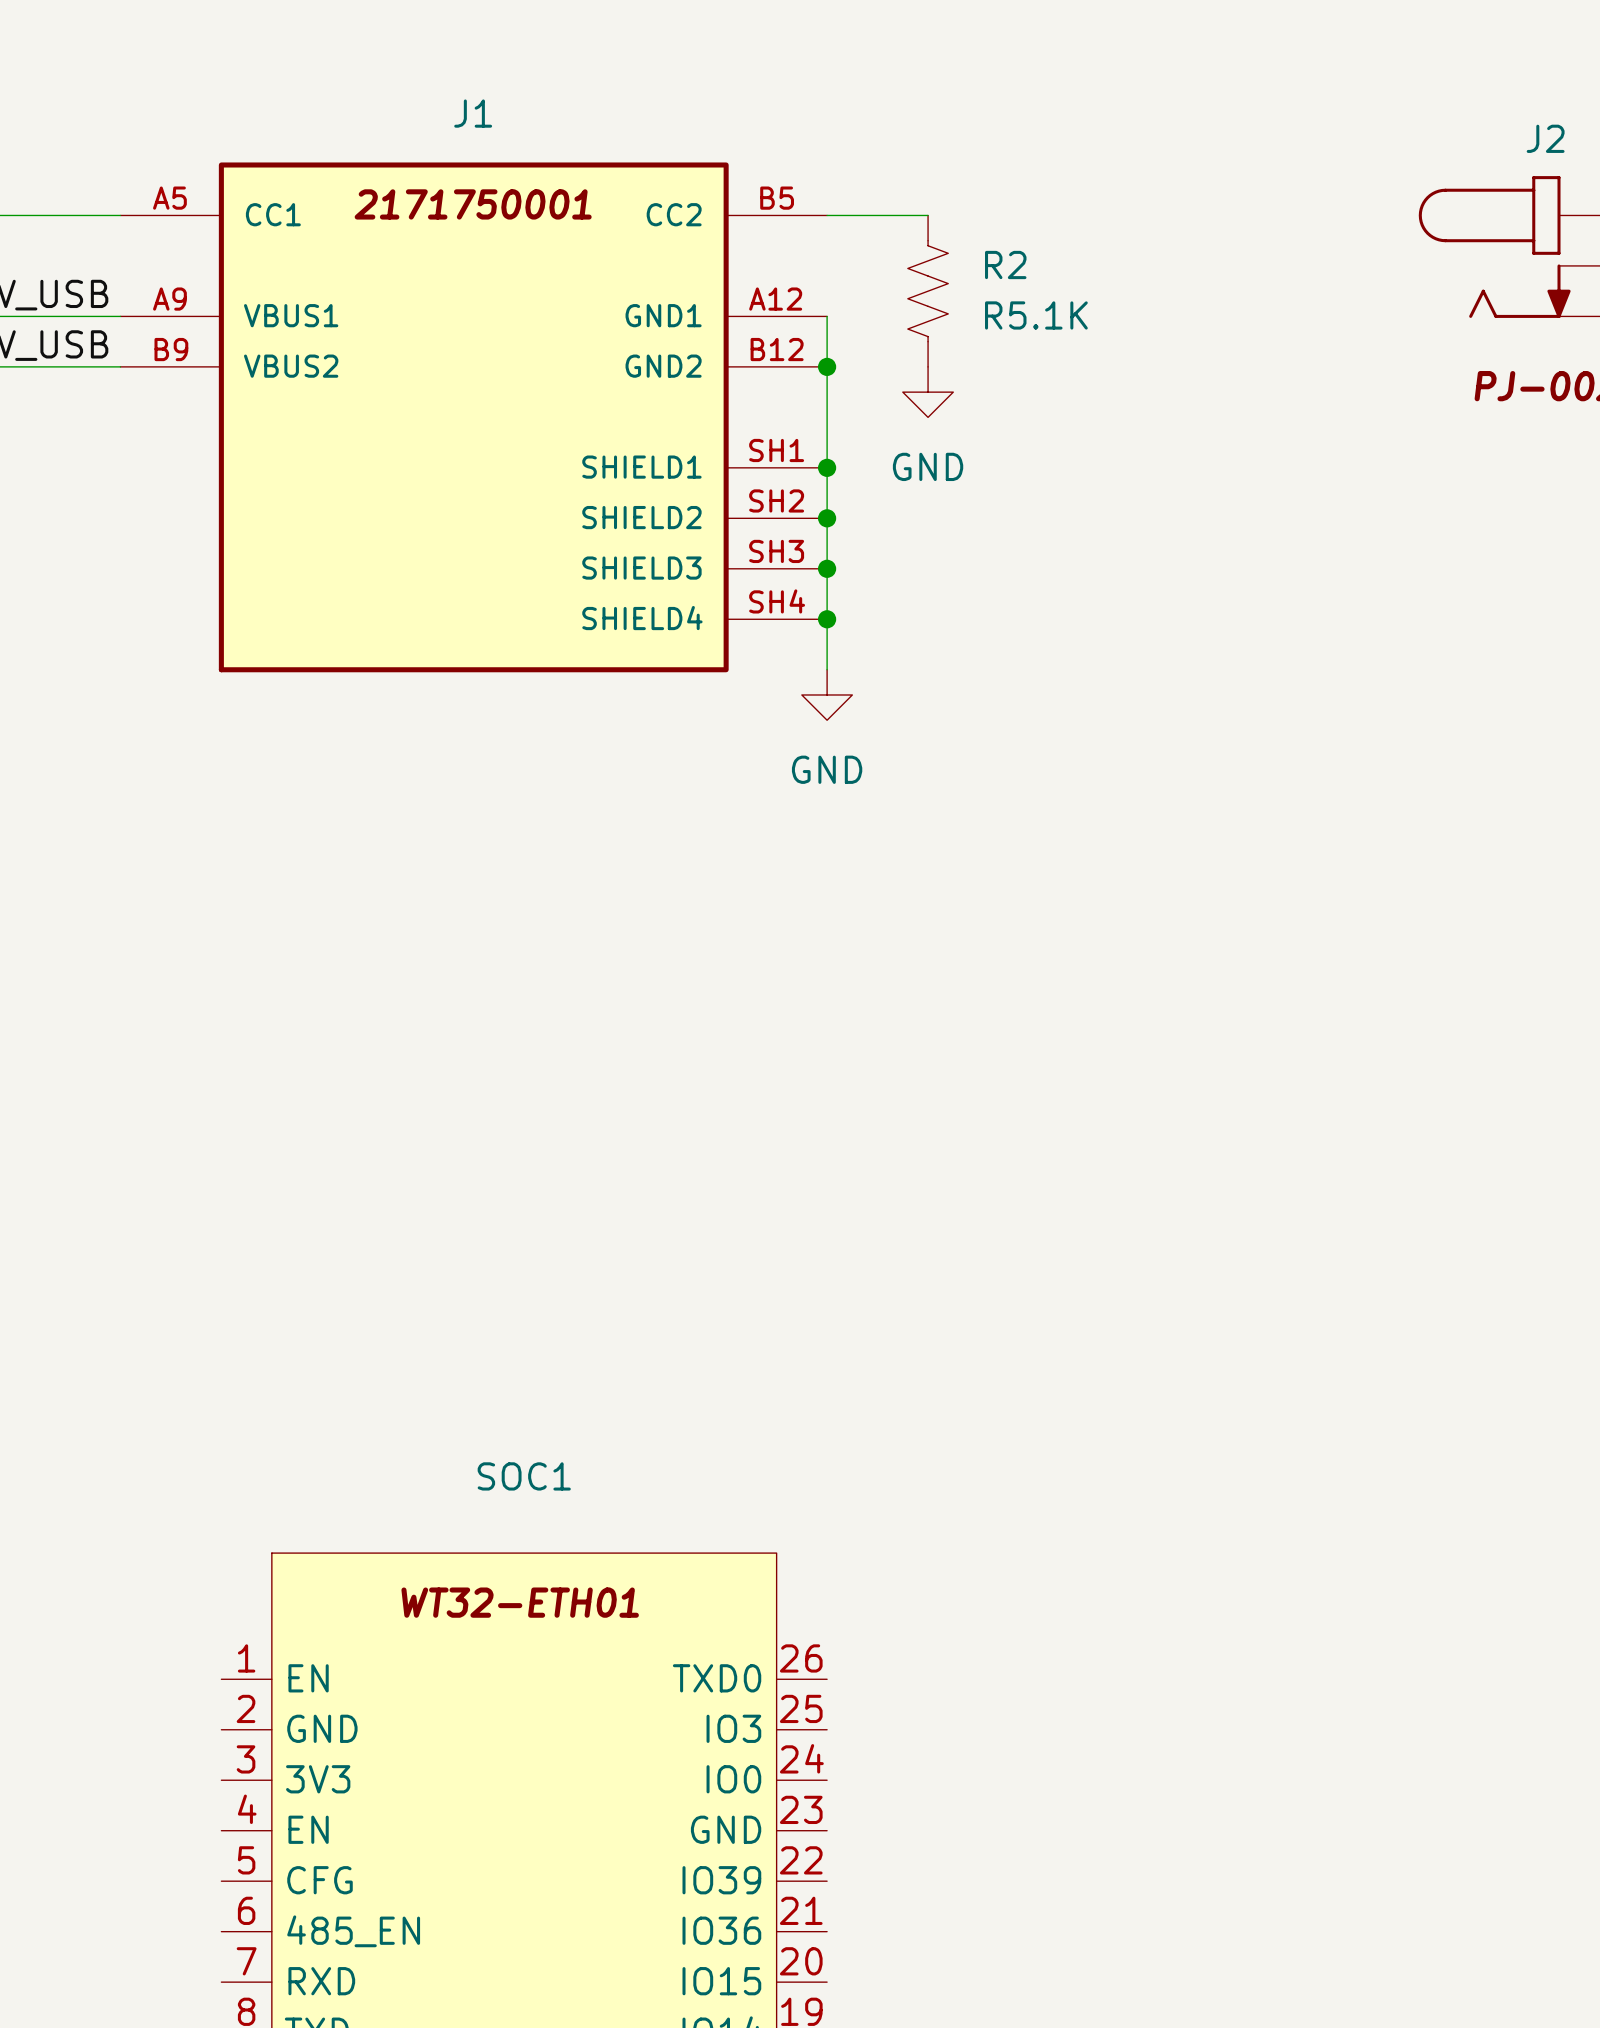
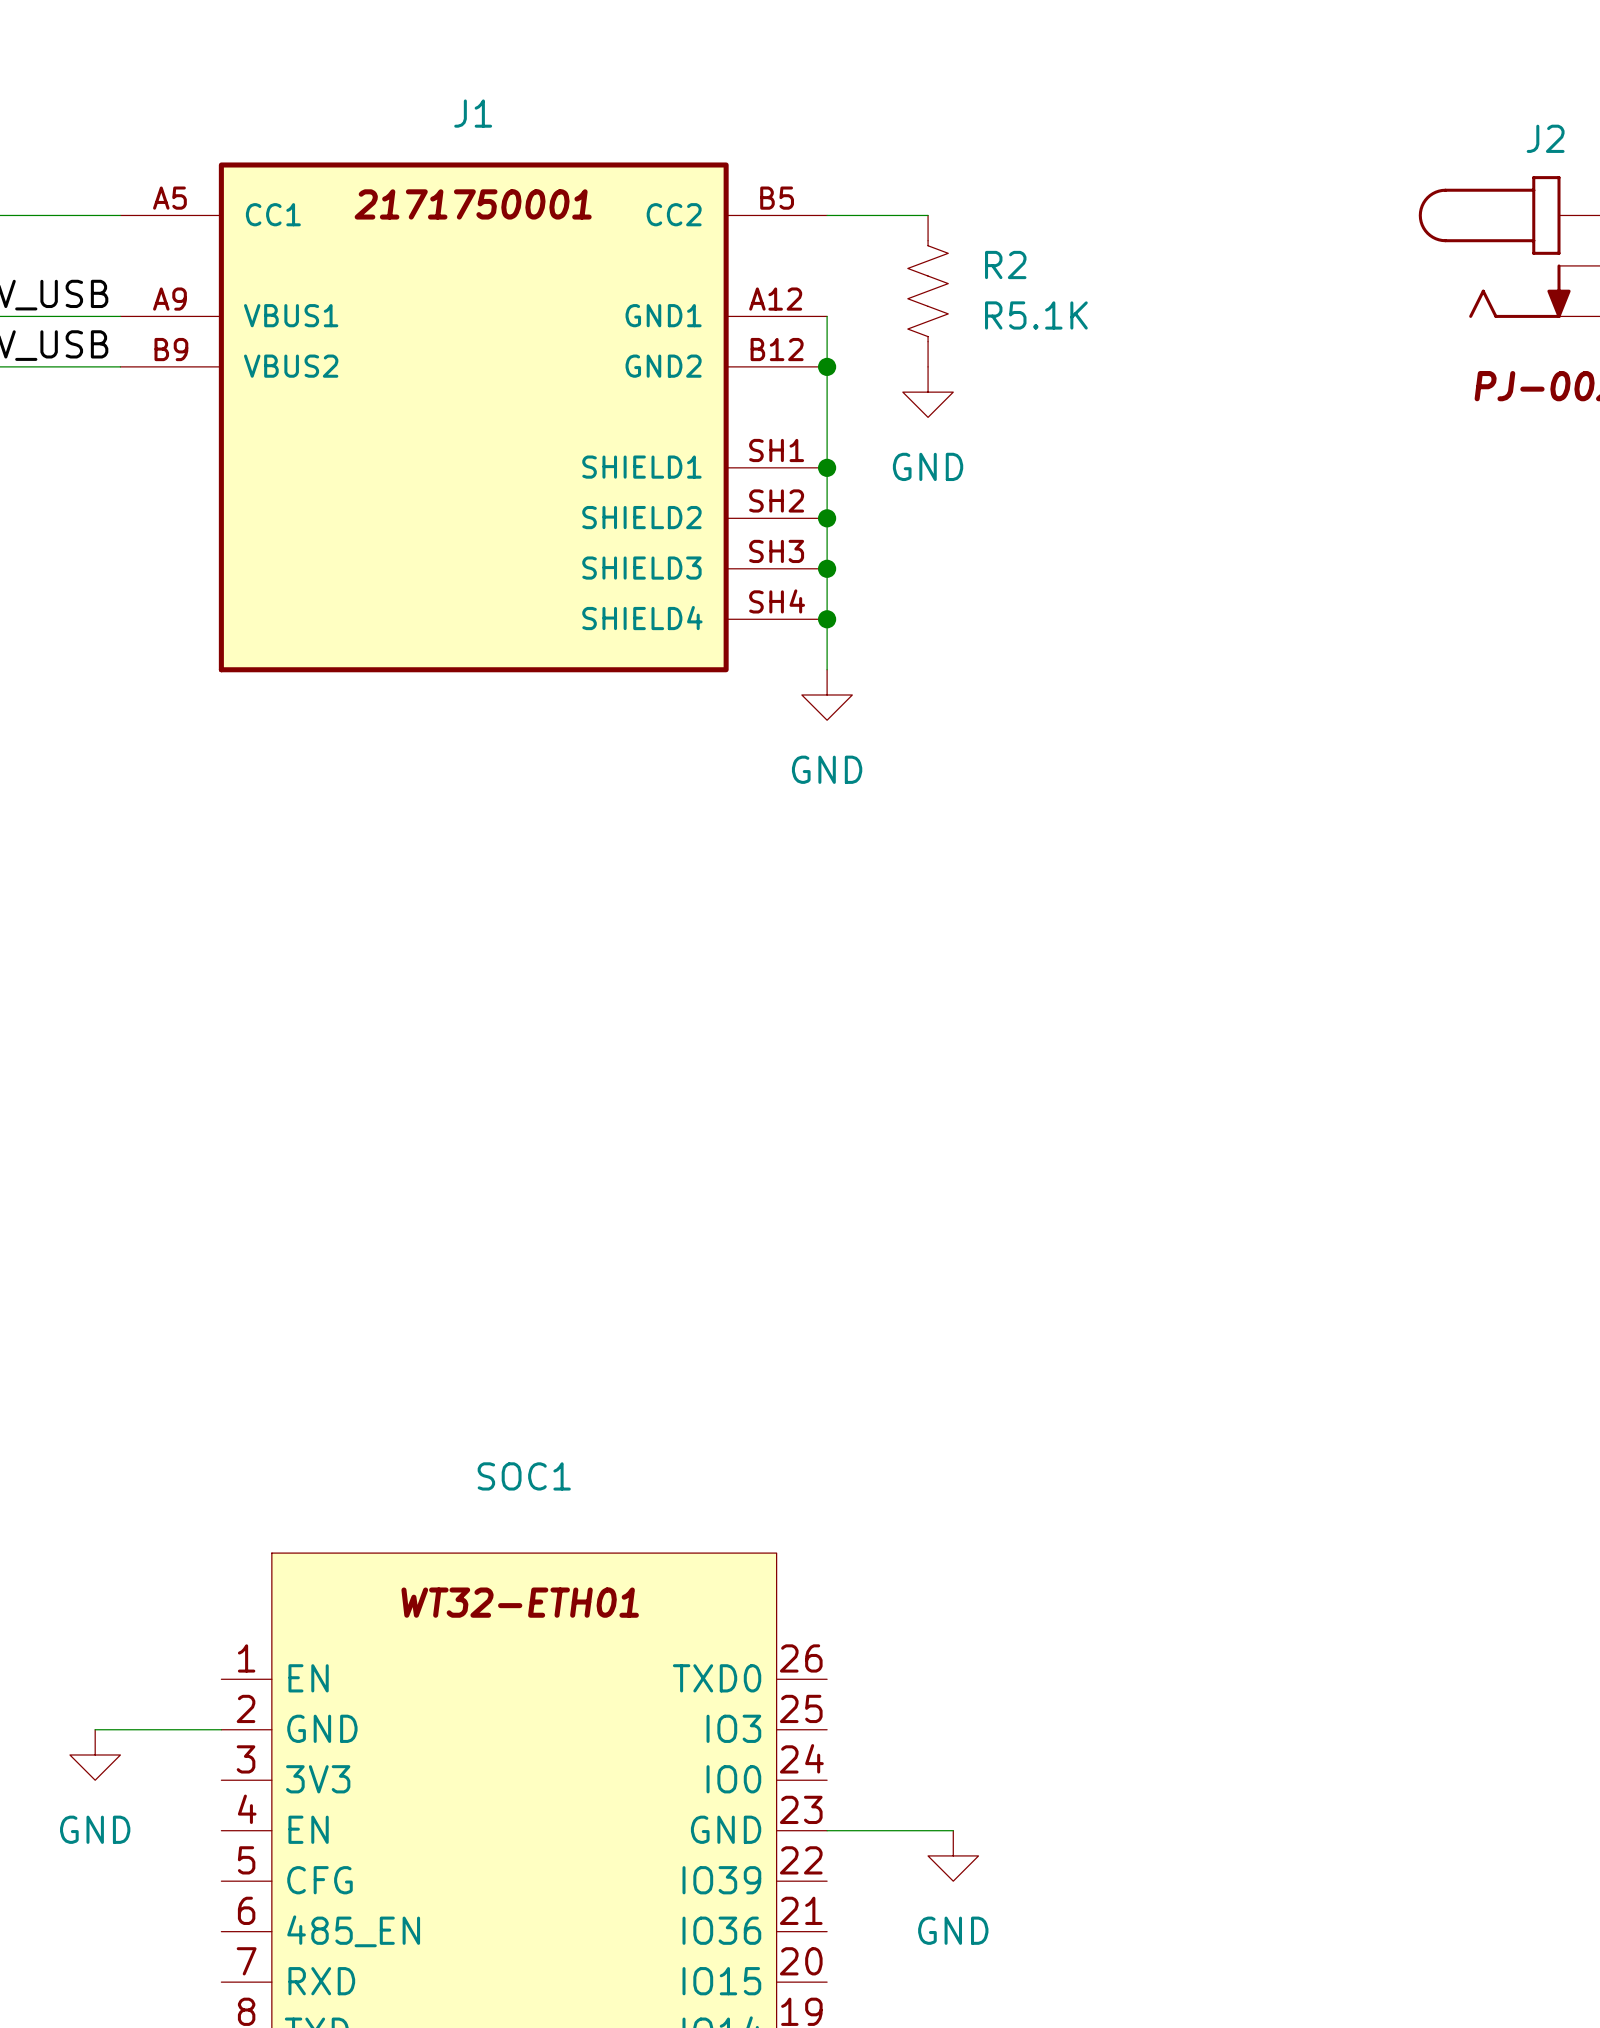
wire: none -> (95, 1729) (221, 1729)
power symbol: none -> GND (95, 1754)
wire: none -> (827, 1830) (953, 1830)
power symbol: none -> GND (953, 1855)

